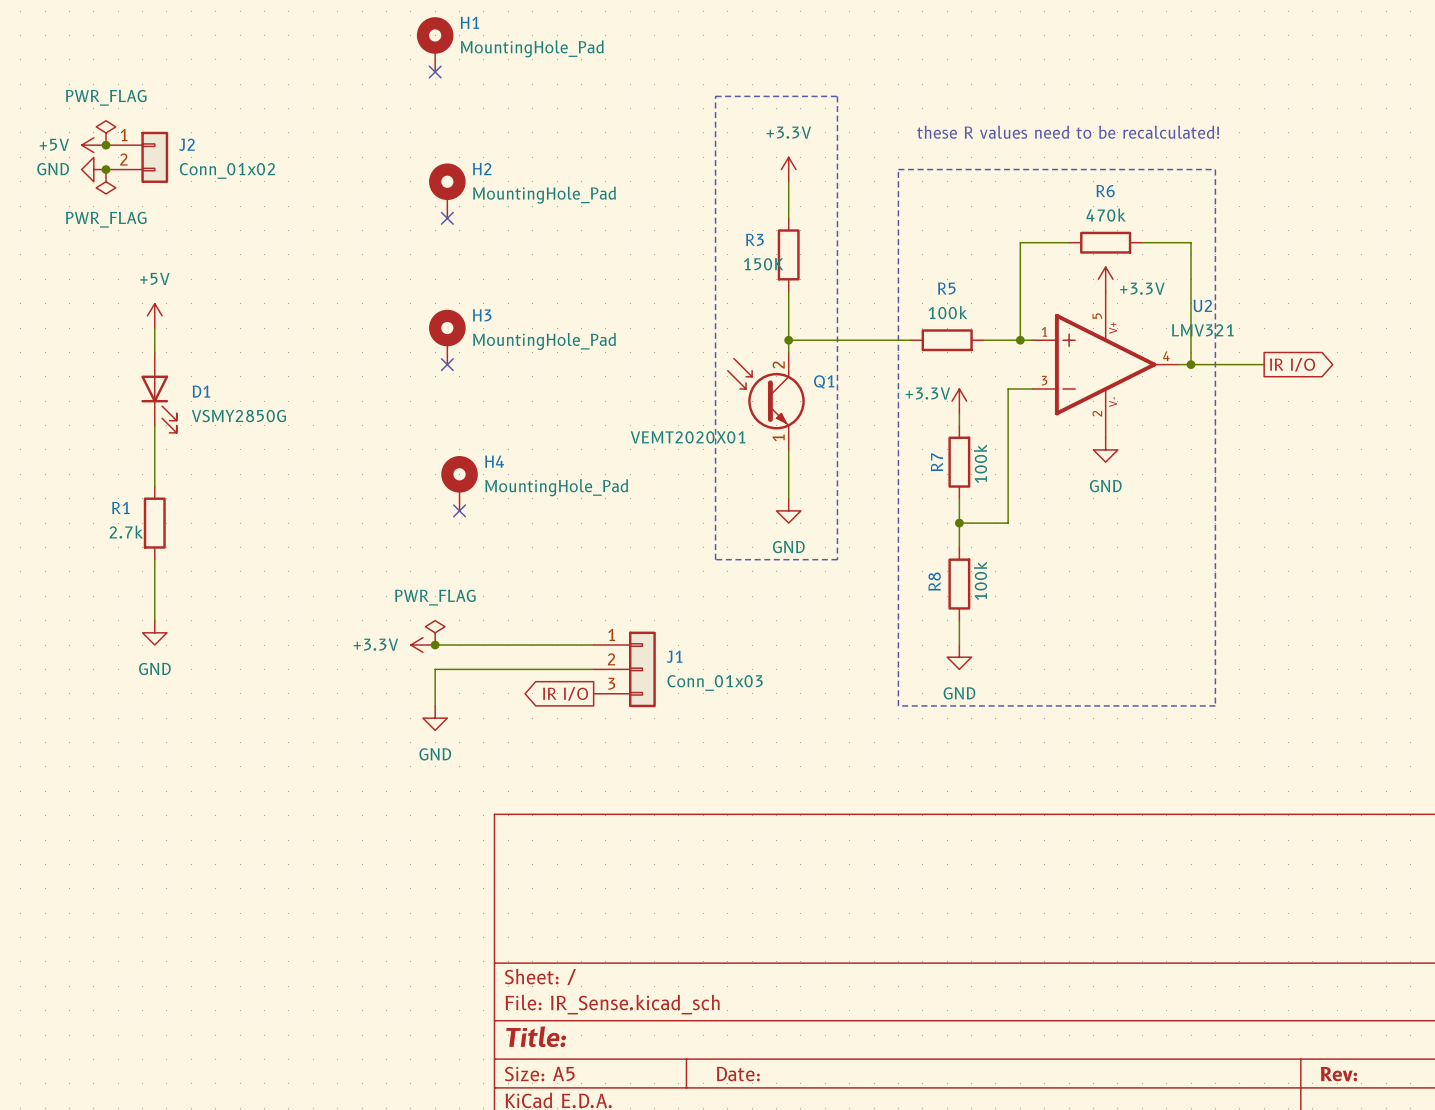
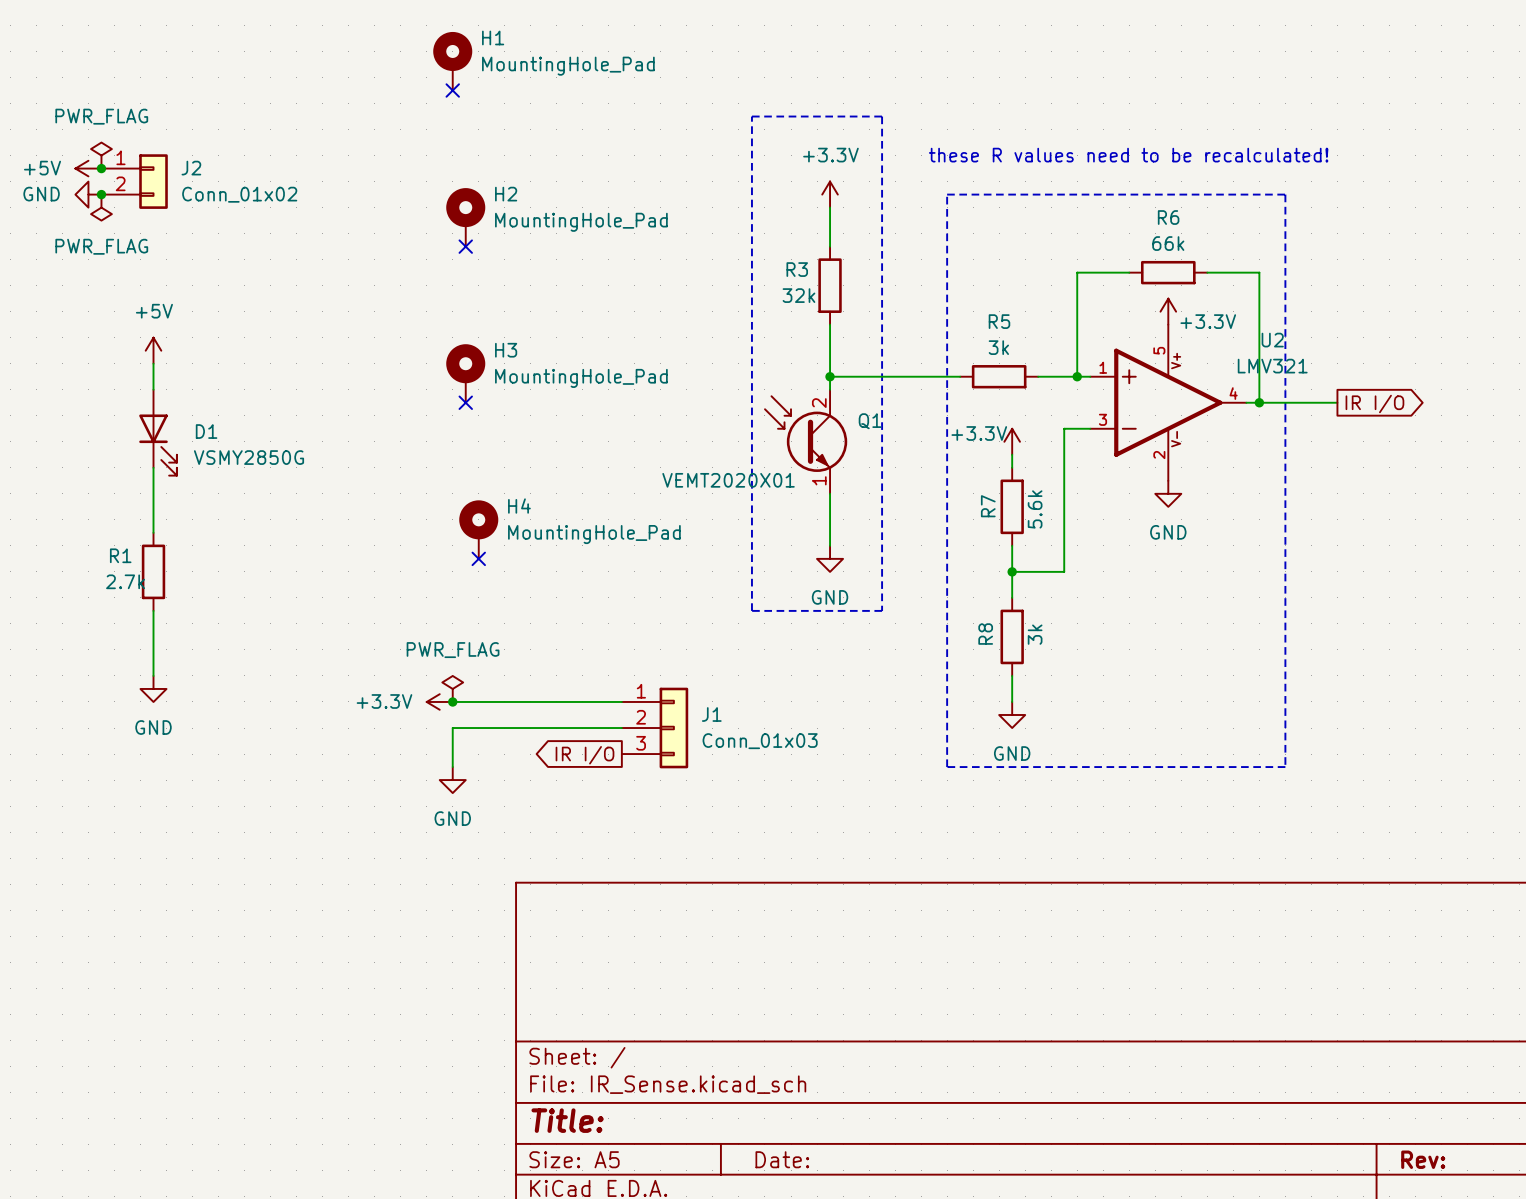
R6 value: 470k (1106, 215) -> 66k (1168, 243)
R3 value: 150K (763, 264) -> 32k (798, 295)
R5 value: 100k (947, 312) -> 3k (998, 347)
R7 value: 100k (980, 463) -> 5.6k (1035, 509)
R8 value: 100k (980, 580) -> 3k (1035, 634)

